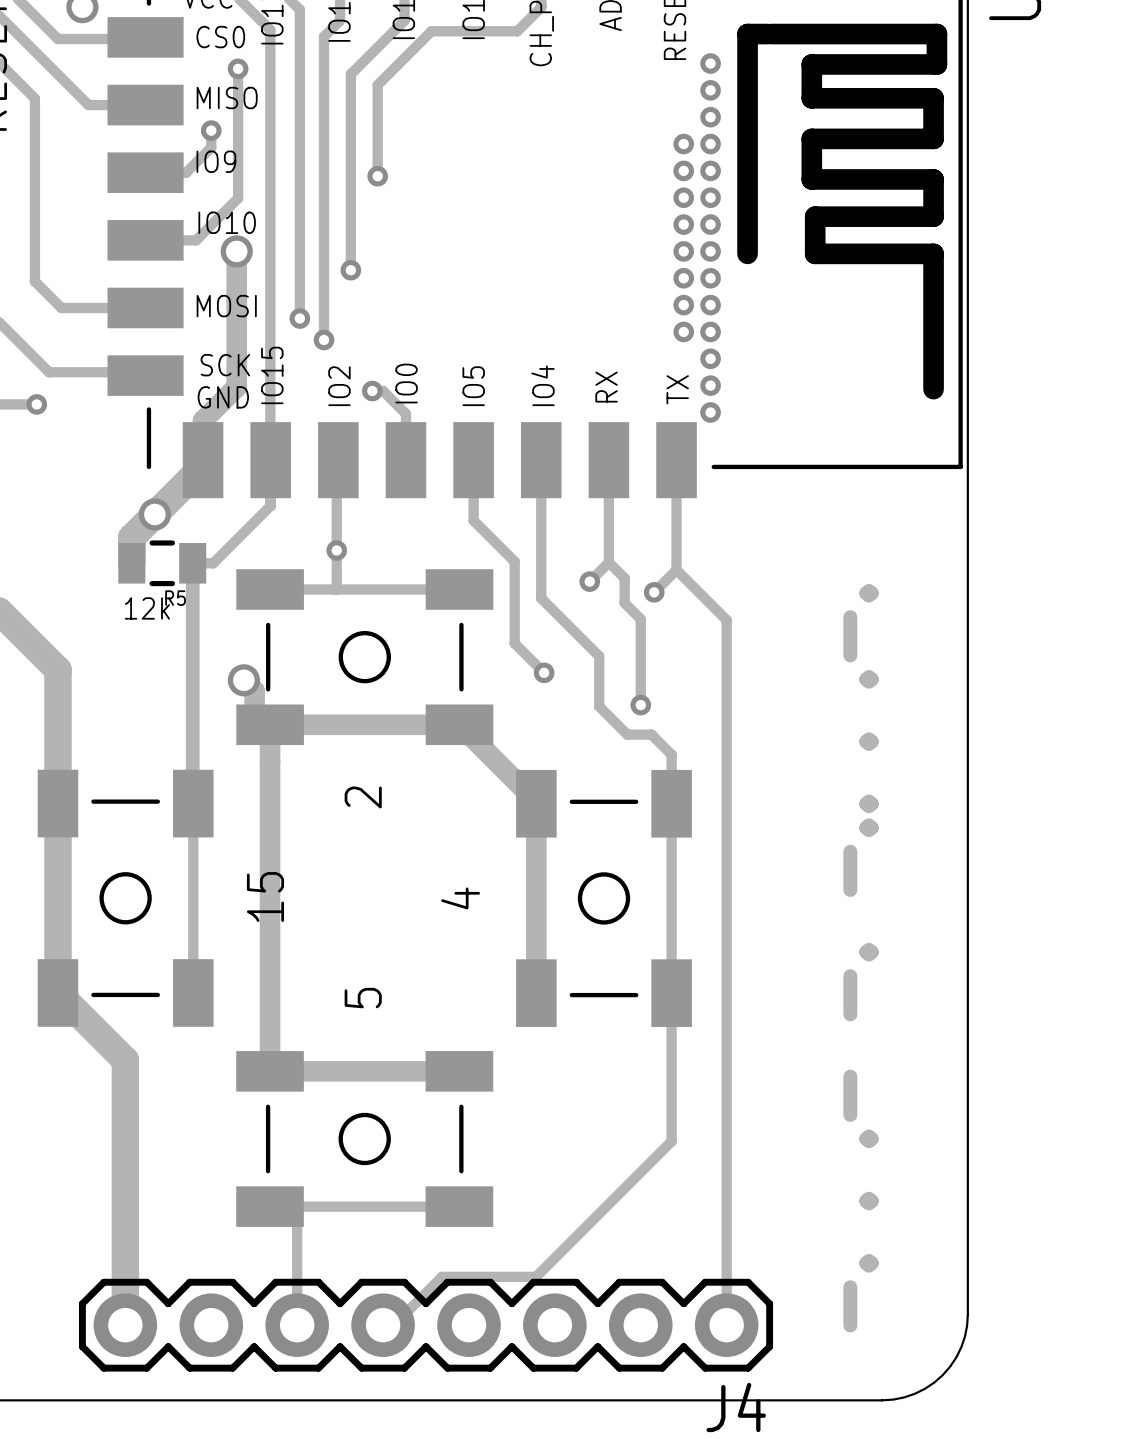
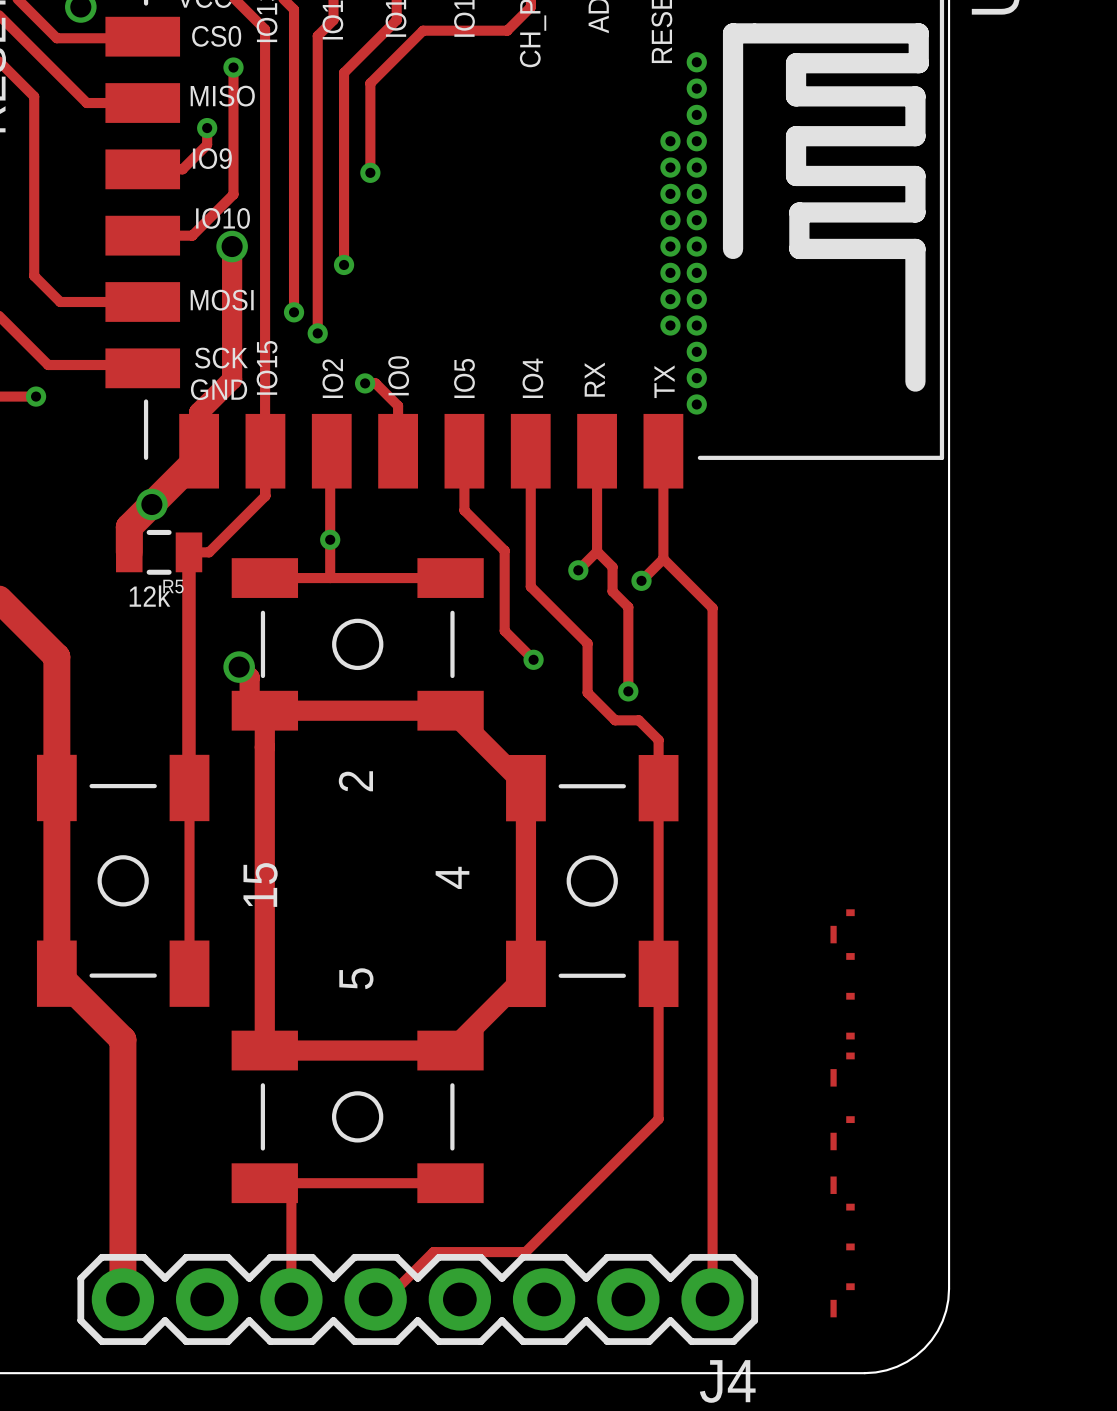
track: none -> (525, 975) (450, 1050)

